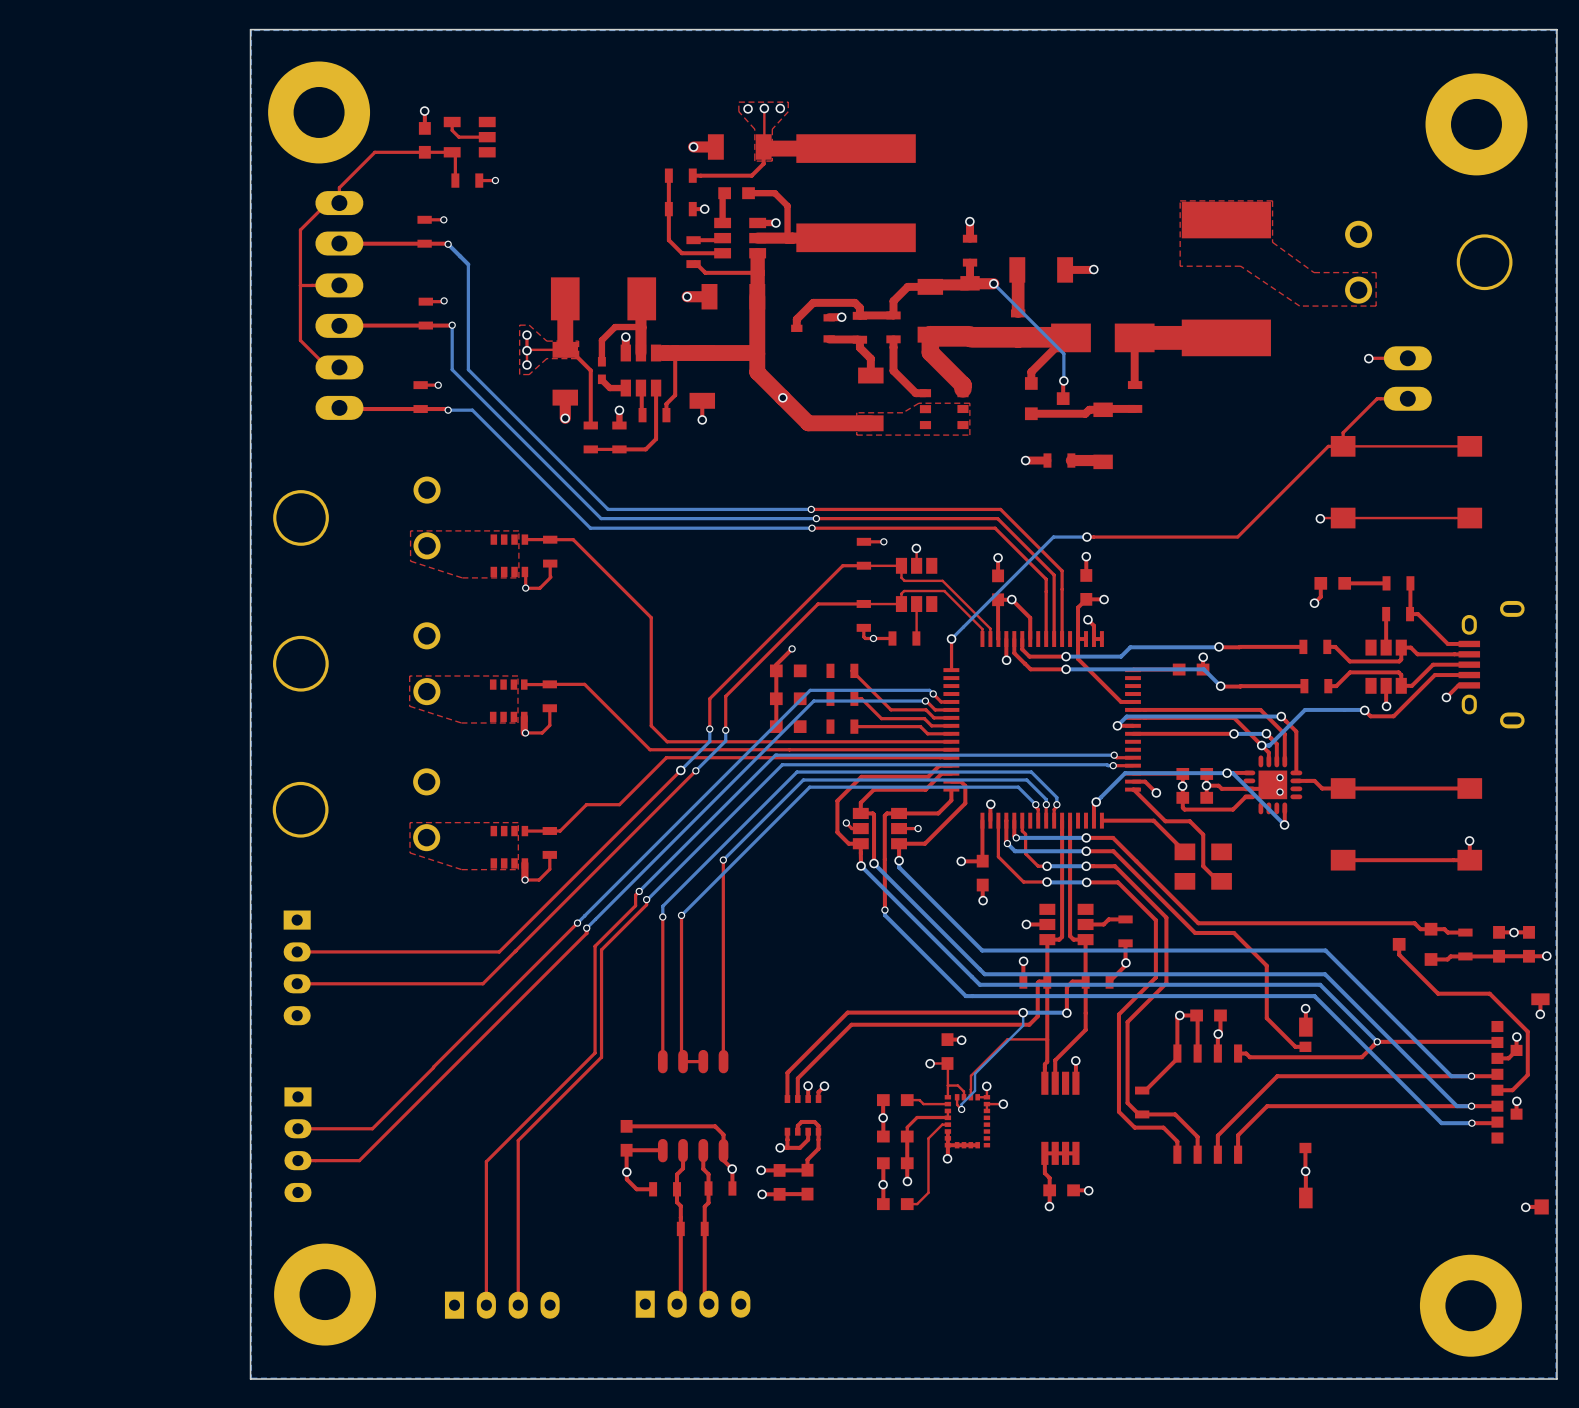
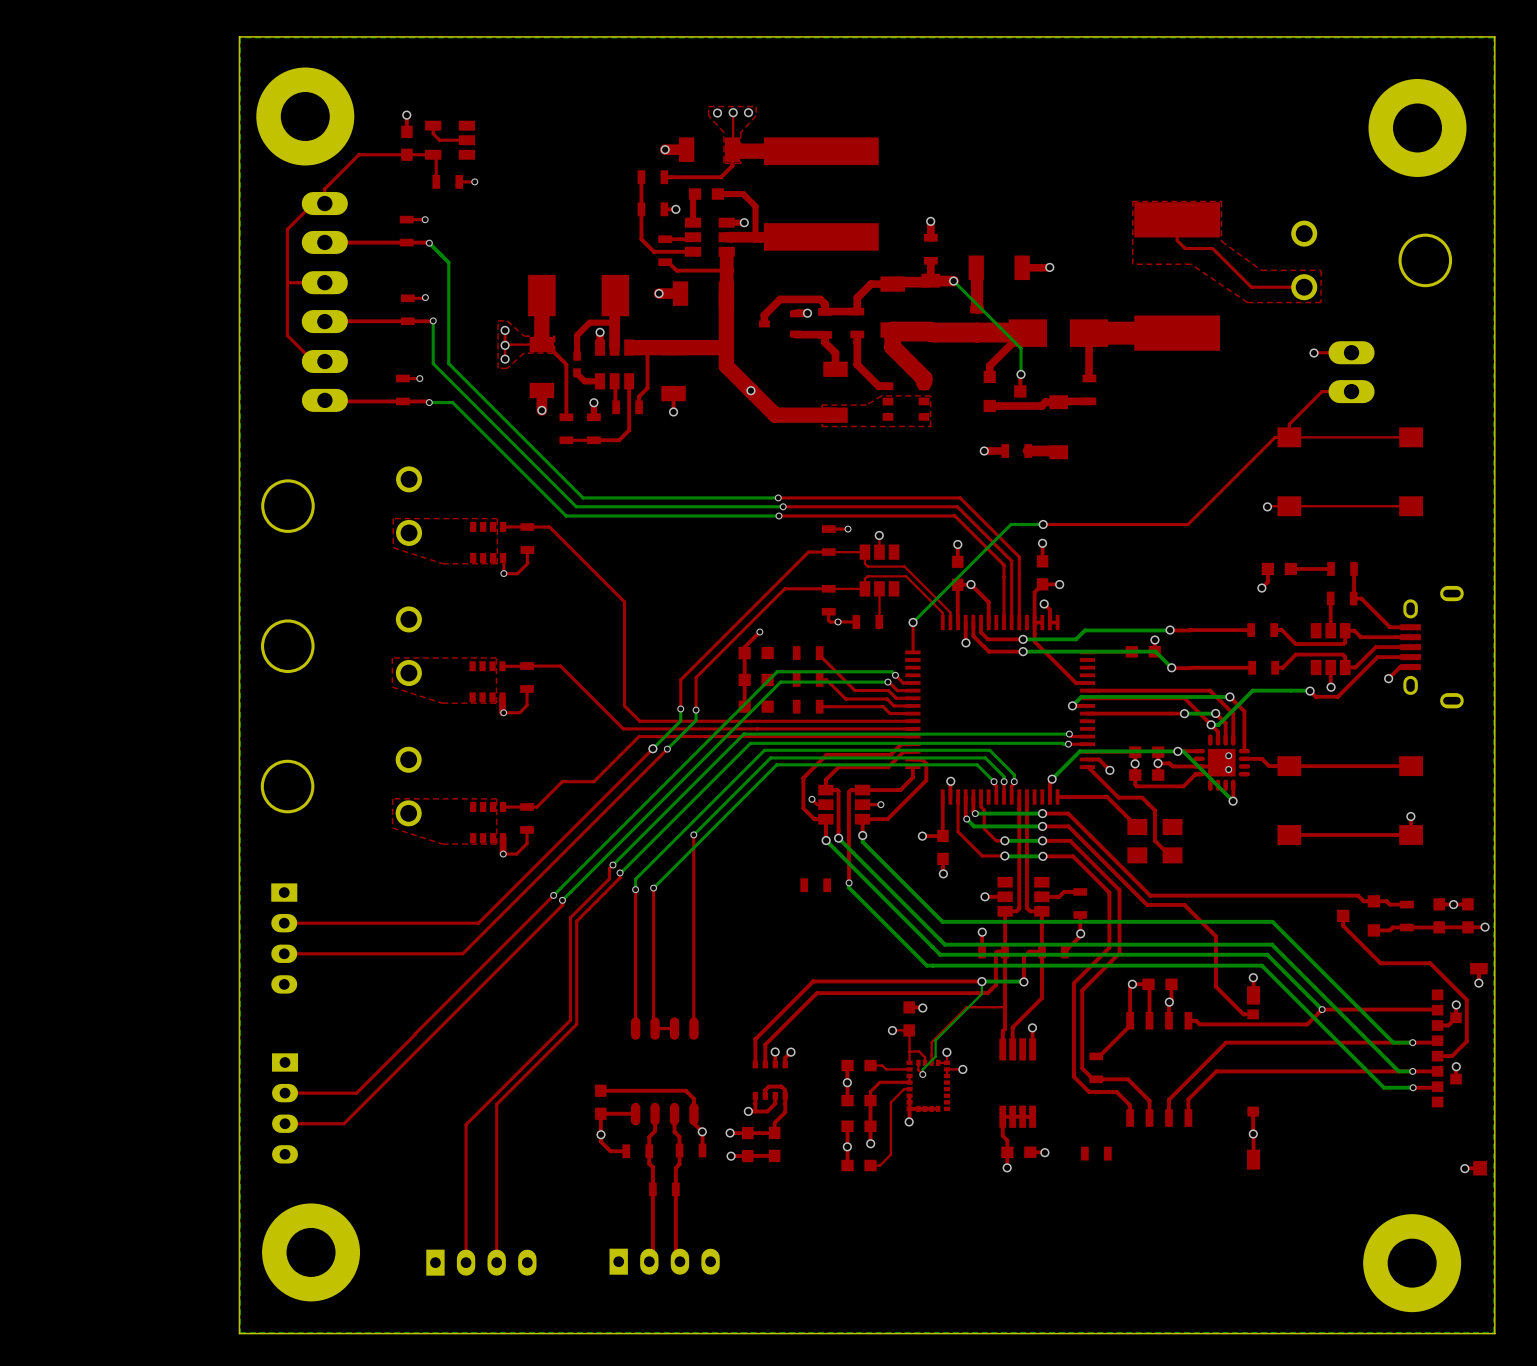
top track: none -> (1177, 219) (1177, 240) (1185, 248) (1212, 248) (1251, 287) (1304, 287)
part: none -> (815, 885)
part: none -> (1096, 1153)

